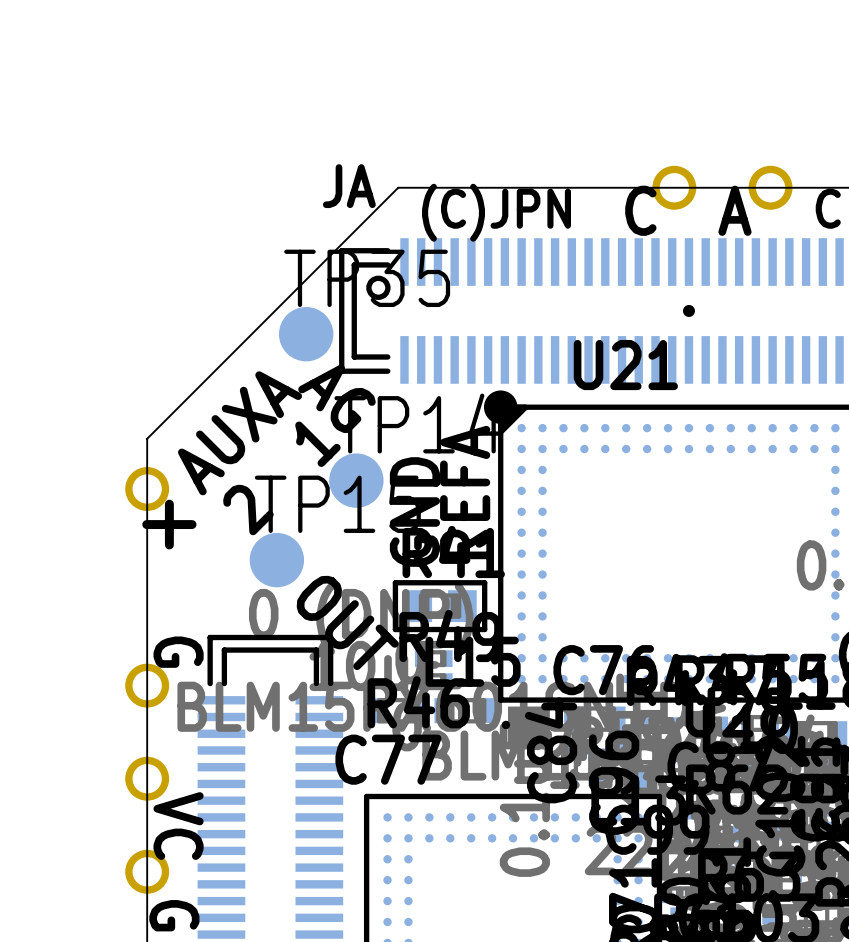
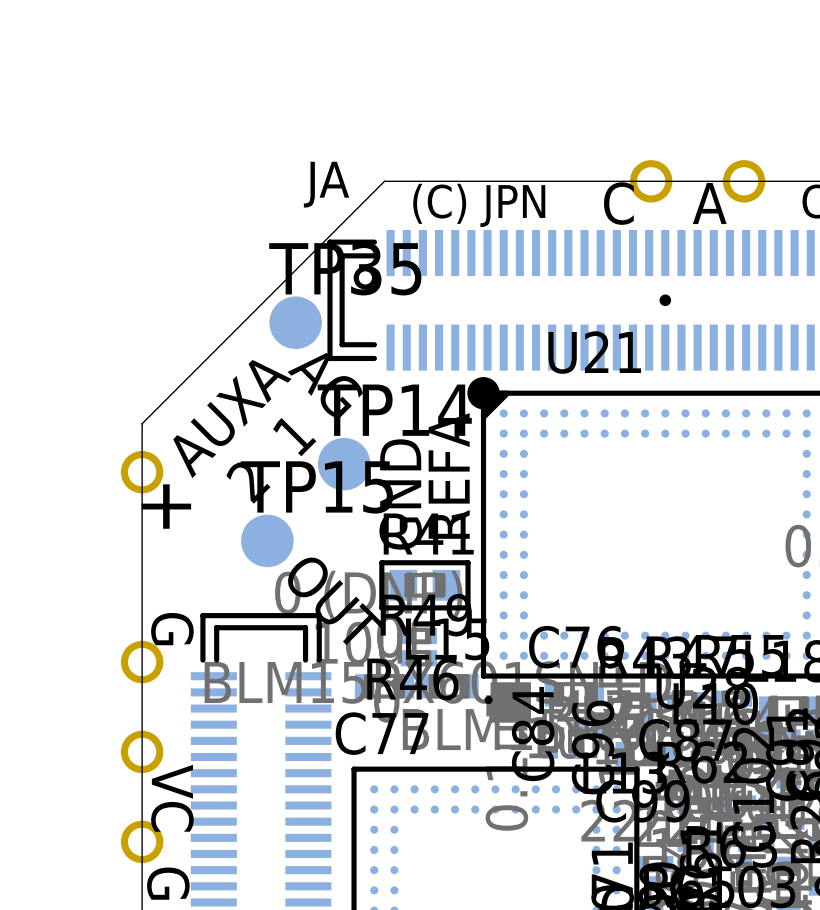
text: (C)JPN (496, 212) -> (C) JPN (479, 205)

